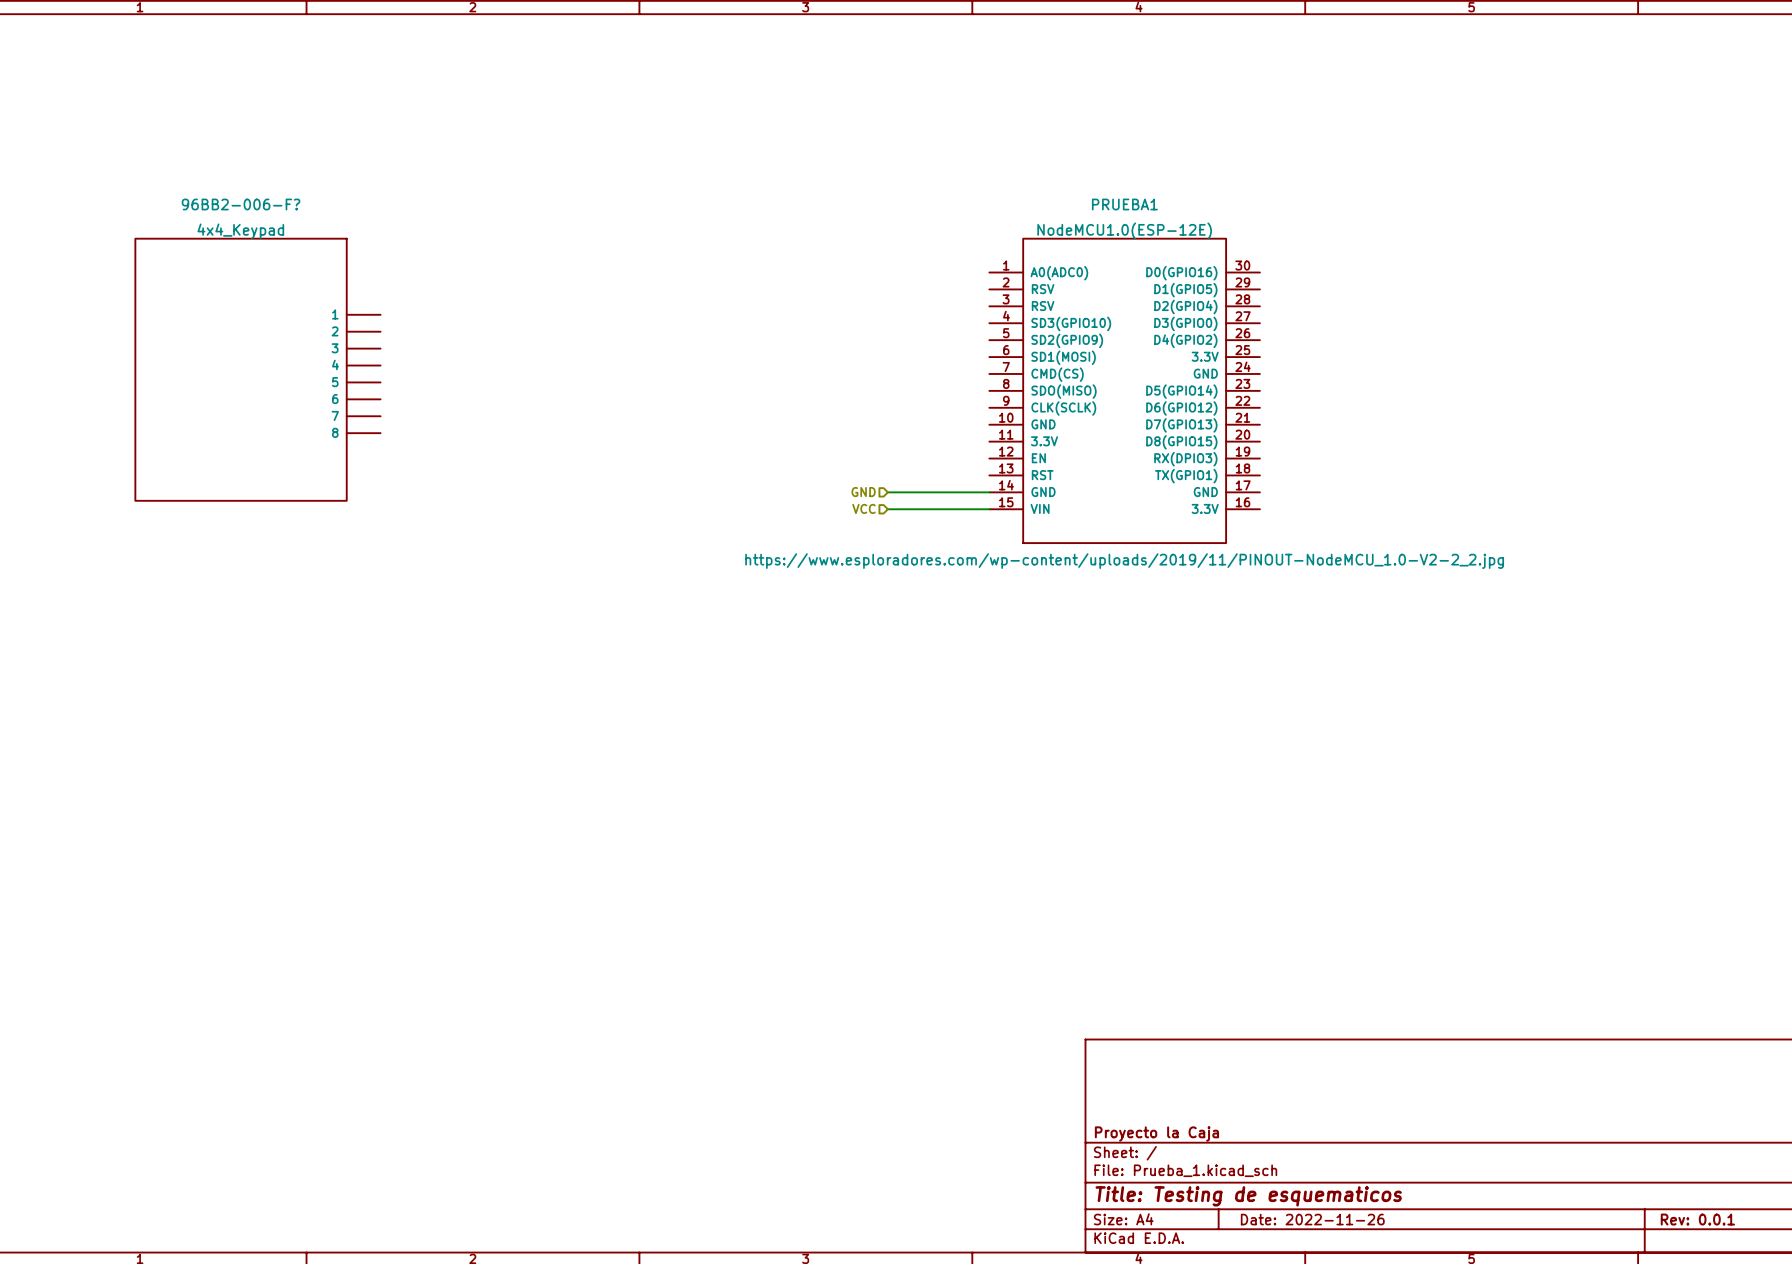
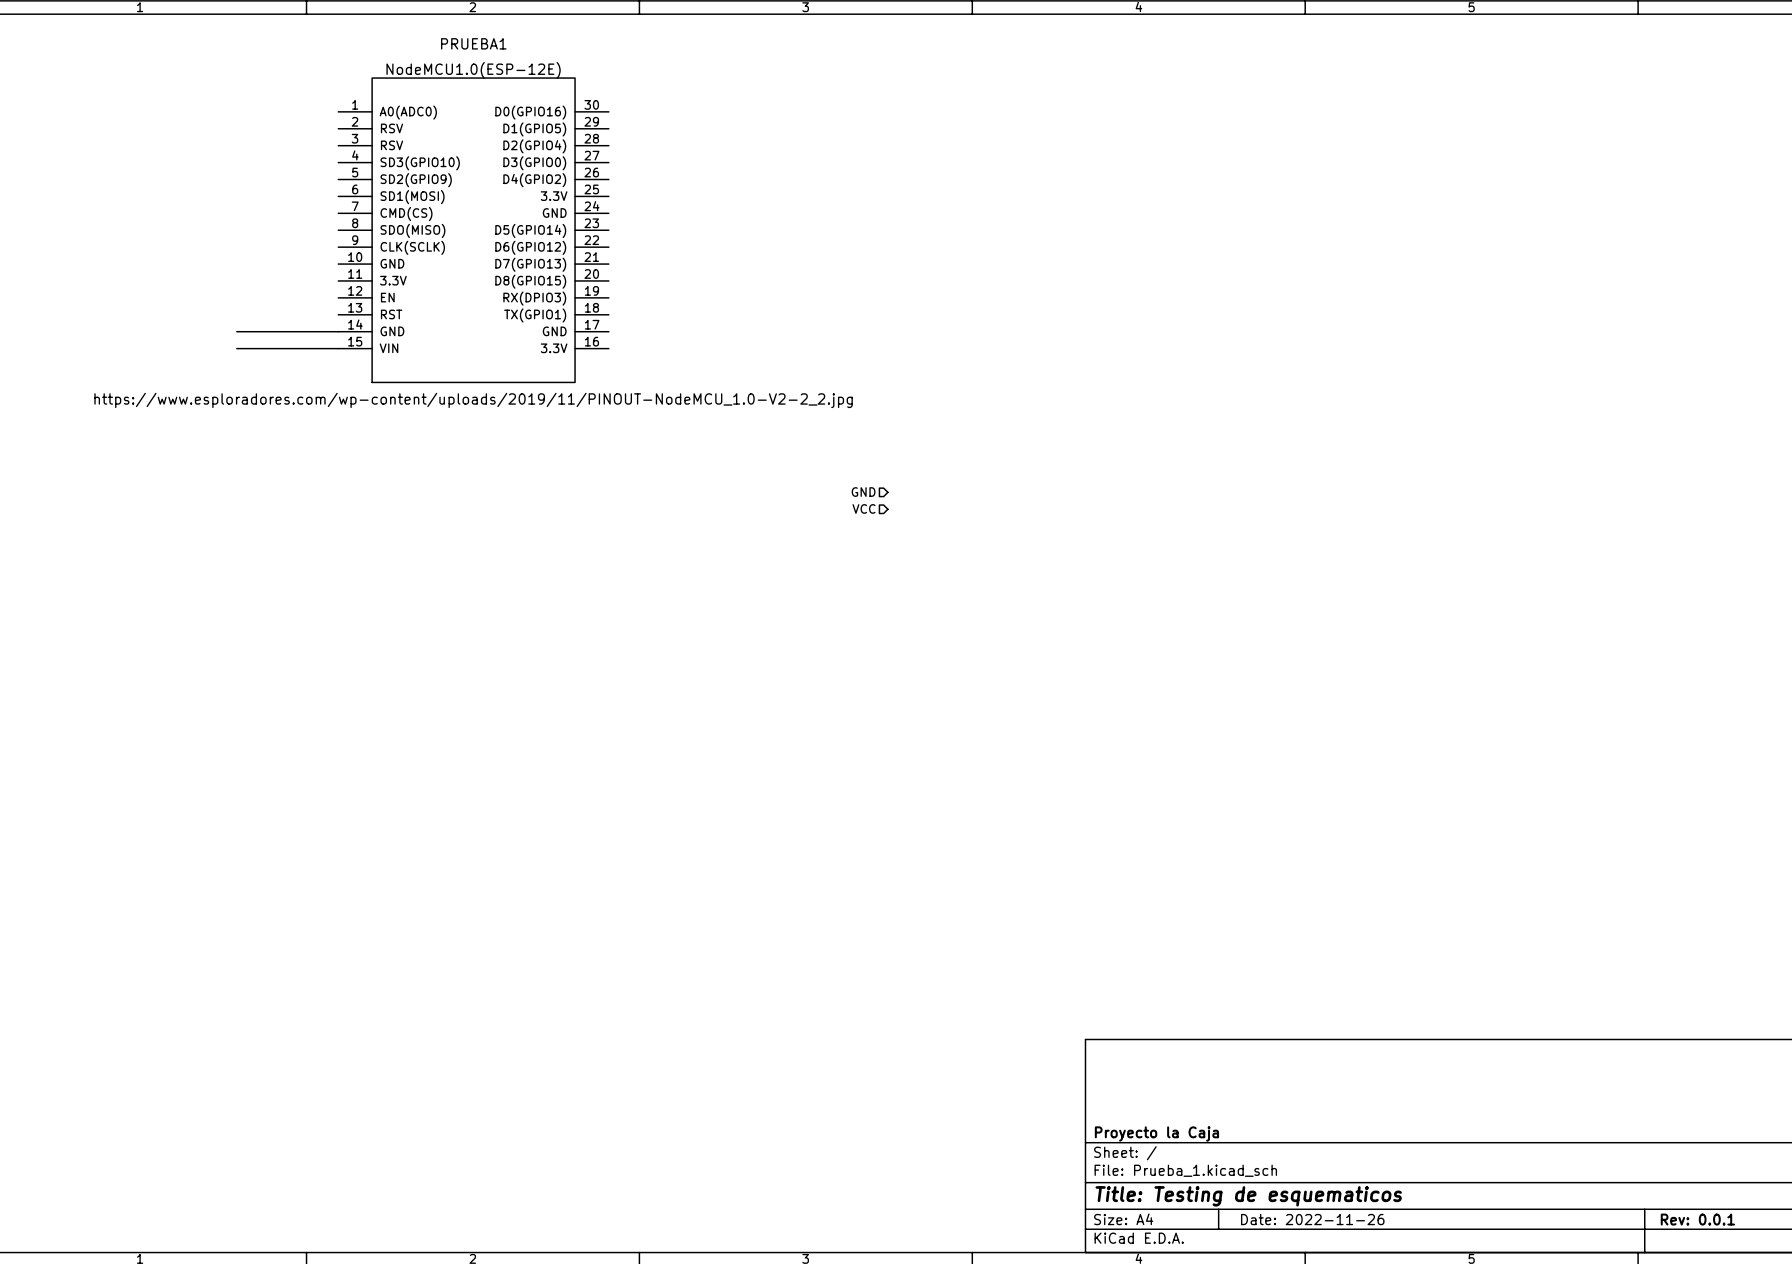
wire: none -> (236, 331) (338, 331)
wire: none -> (236, 348) (338, 348)
96BB2-006-F?: 4x4_Keypad (257, 369) -> none
PRUEBA1 position: (1124, 390) -> (473, 230)
wire: (887, 492) (989, 492) -> none
wire: (887, 509) (989, 509) -> none

